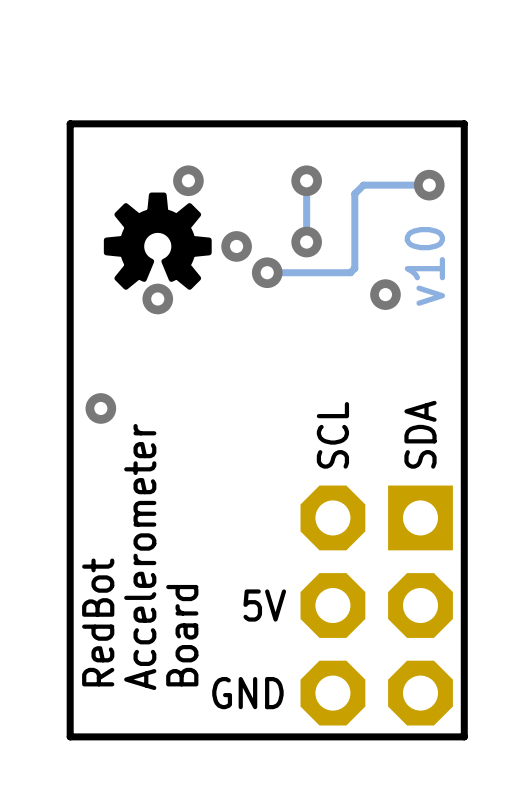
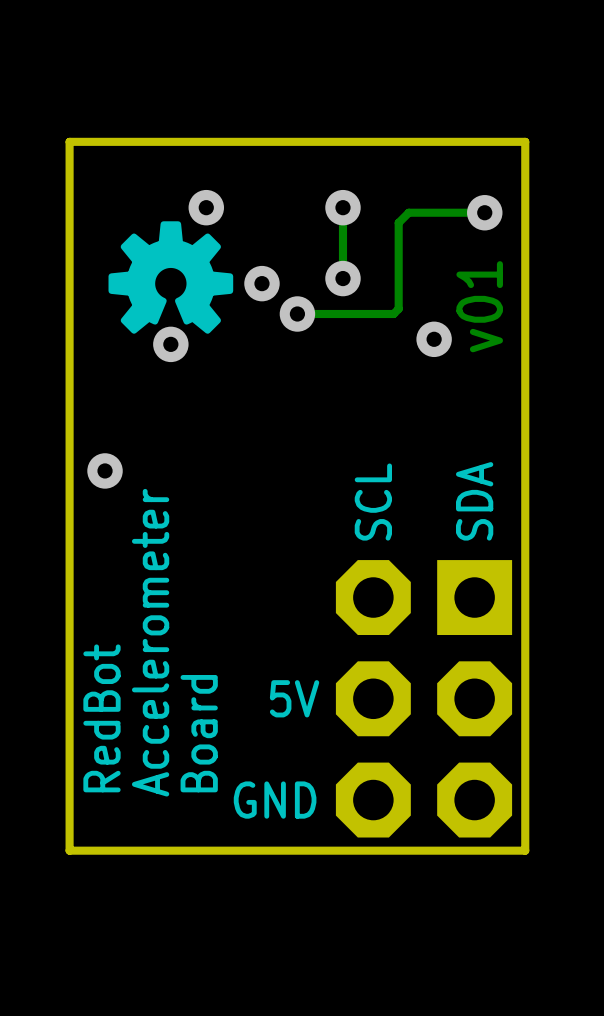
text: v10 (424, 266) -> v01 (479, 306)

